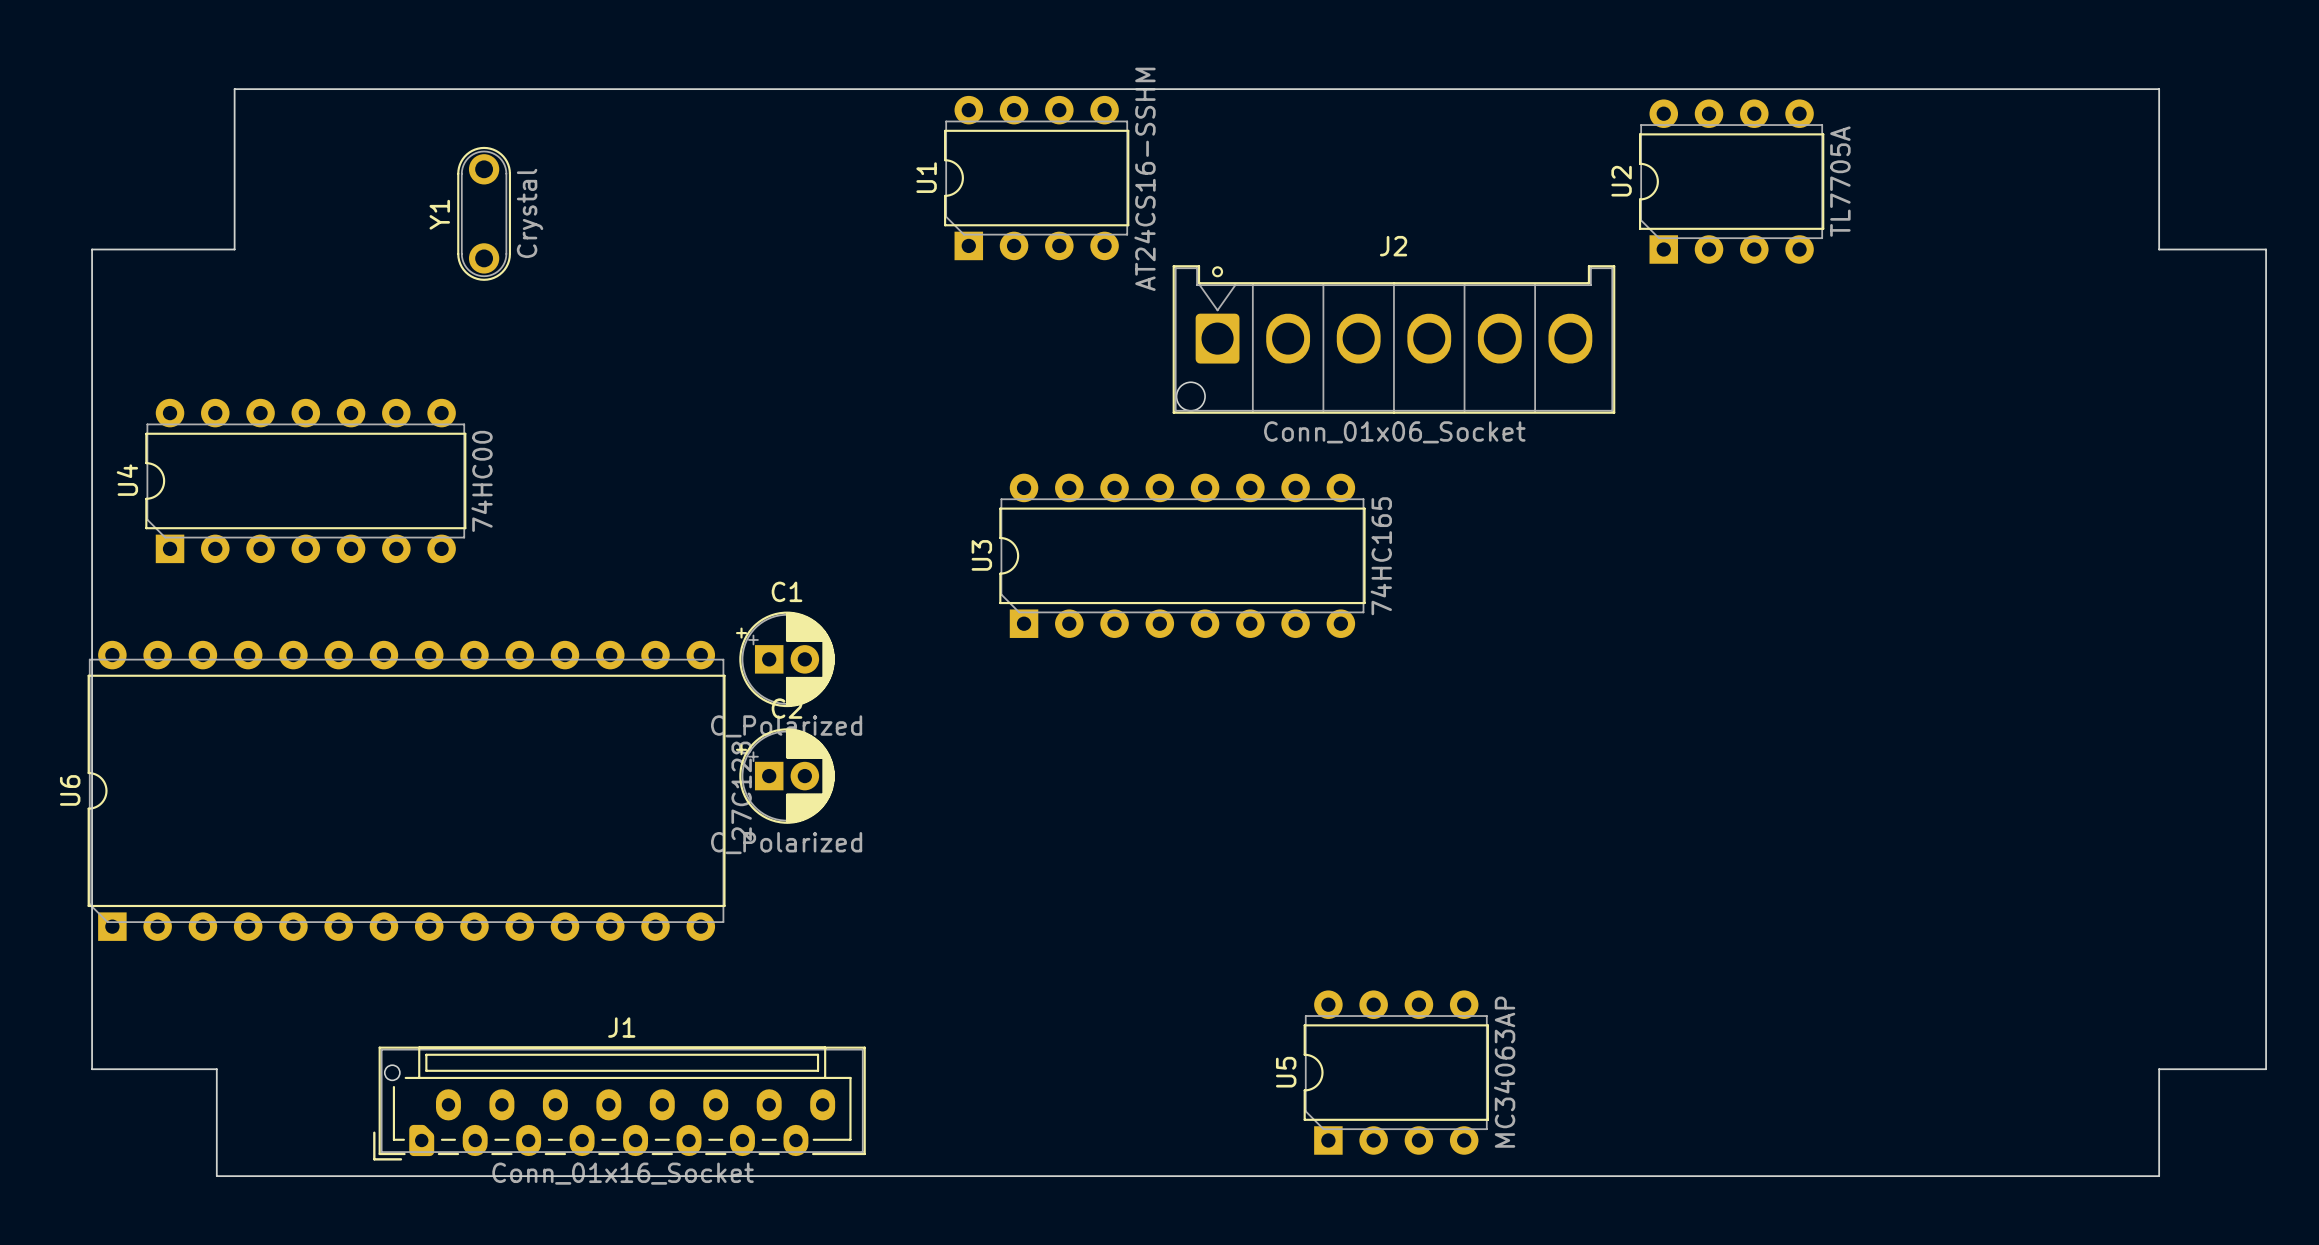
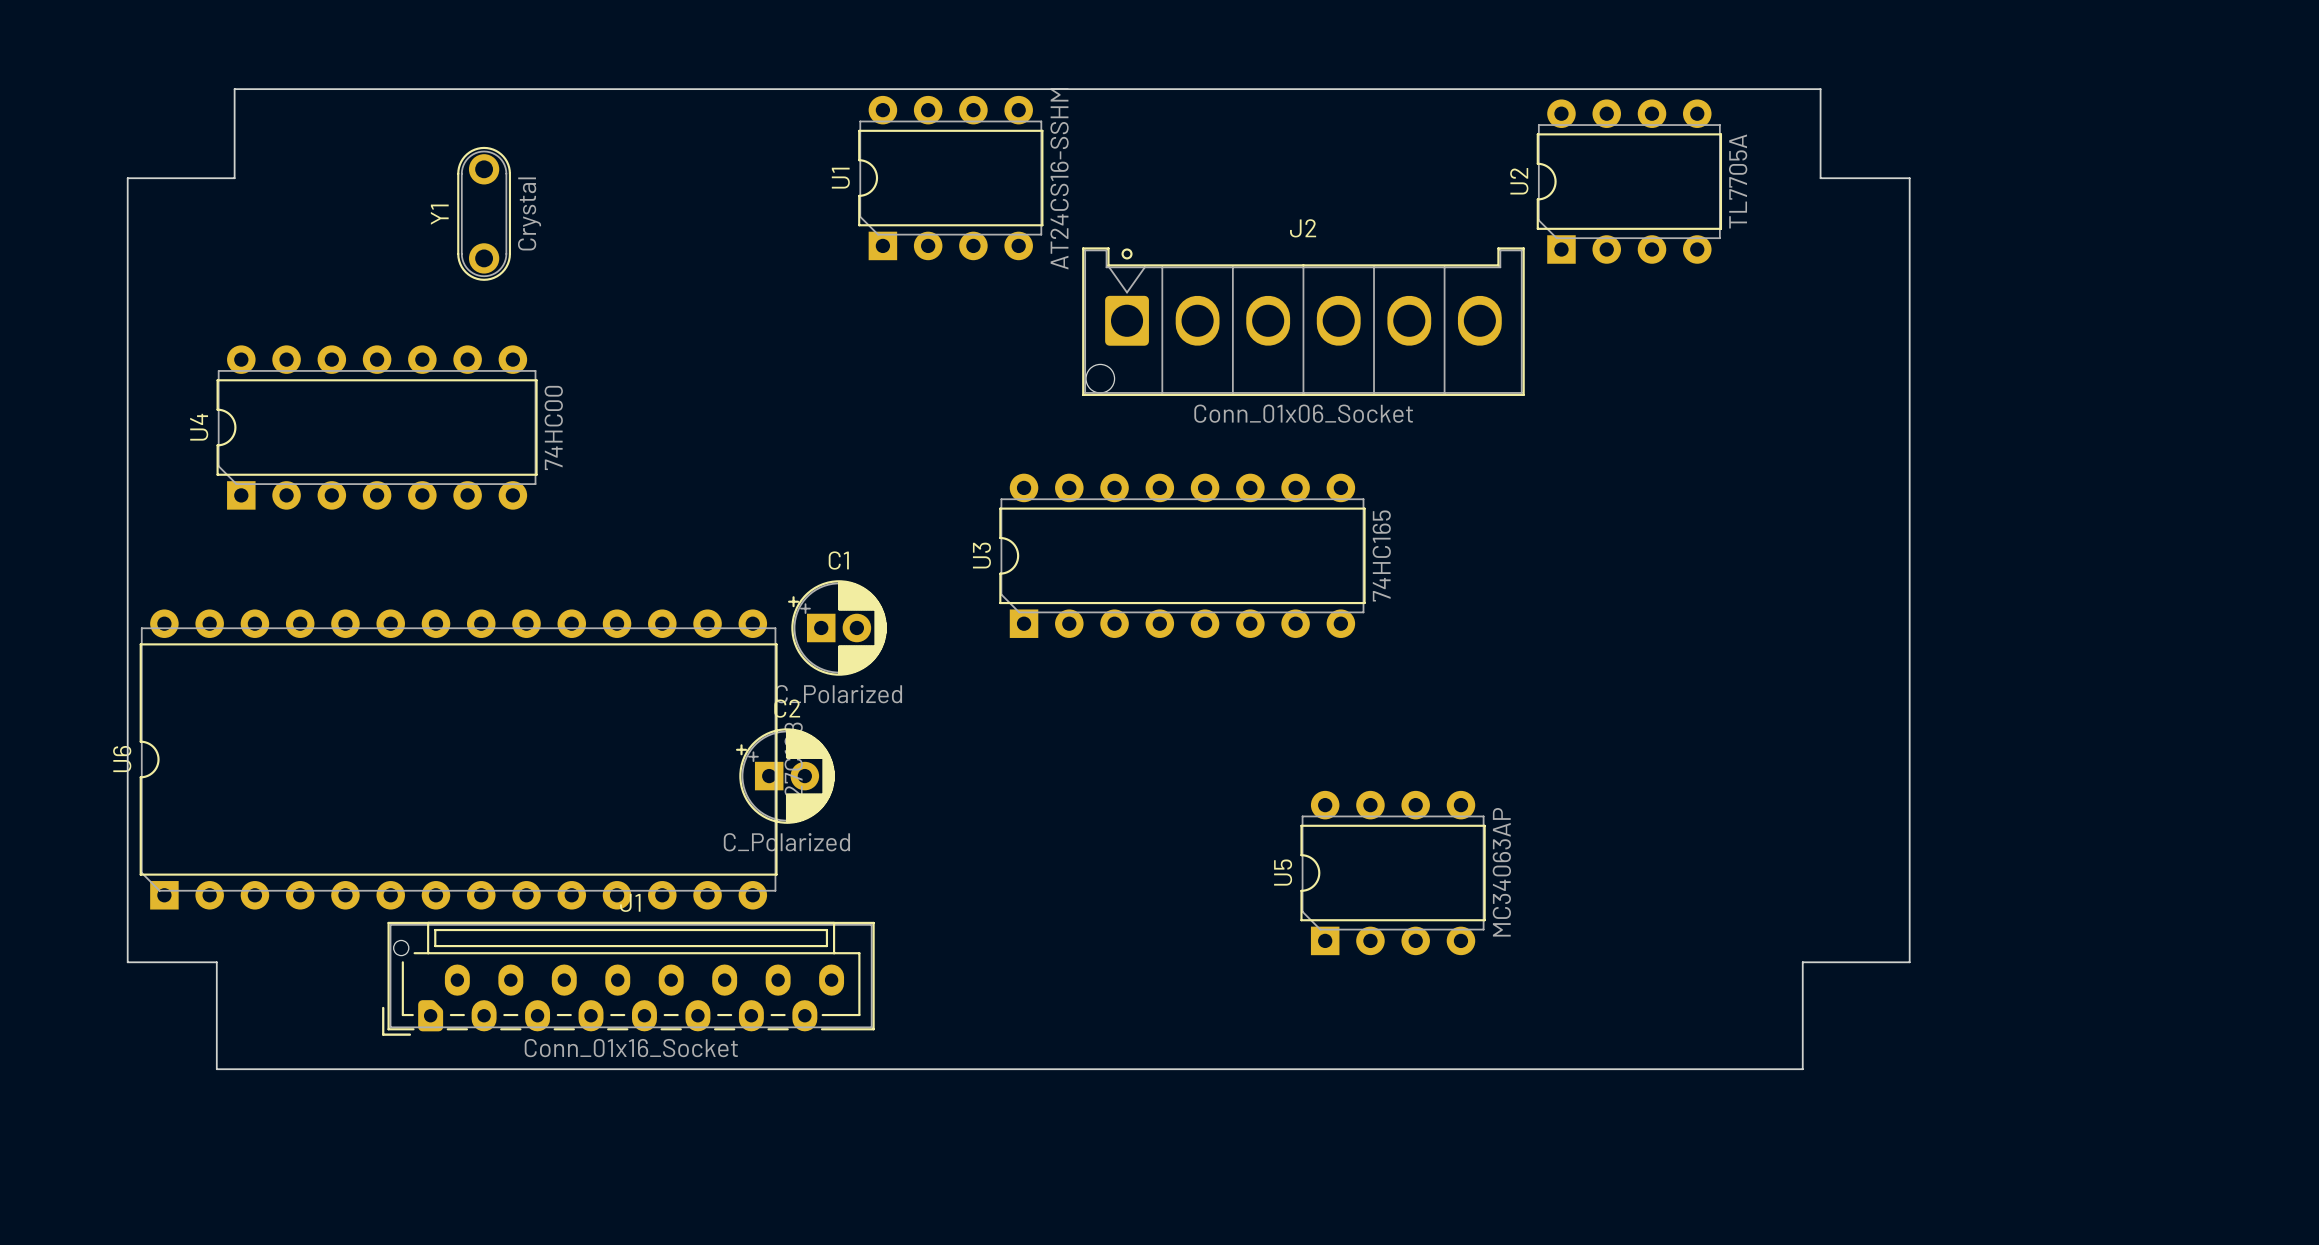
board edge: (1820, 89) (2159, 89) (2159, 249) (2266, 249) (2266, 1069) (2159, 1069) (2159, 1176) (216, 1176) (216, 1069) (92, 1069) (92, 249) (234, 249) (234, 178) -> (1820, 89) (1820, 178) (1909, 178) (1909, 962) (1802, 962) (1802, 1069) (216, 1069) (216, 962) (127, 962) (127, 178) (234, 178)
U1 position: (1036, 178) -> (950, 178)
U2 position: (1731, 181) -> (1629, 181)
J2 position: (1393, 339) -> (1303, 321)
U4 position: (305, 480) -> (377, 427)
C1 position: (785, 659) -> (837, 627)
U6 position: (406, 790) -> (458, 759)
U5 position: (1396, 1072) -> (1393, 873)
J1 position: (619, 1103) -> (628, 978)

